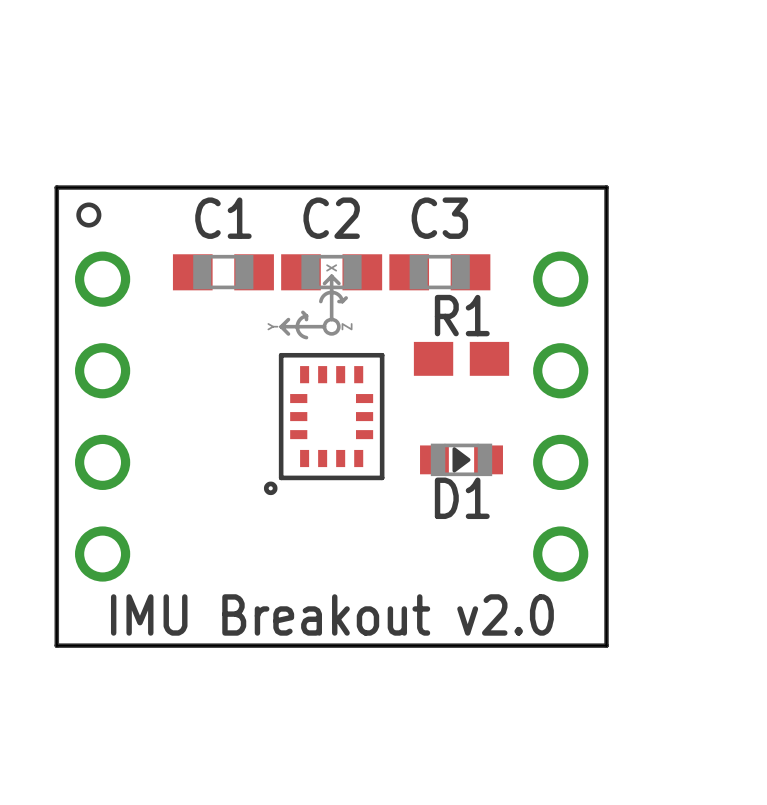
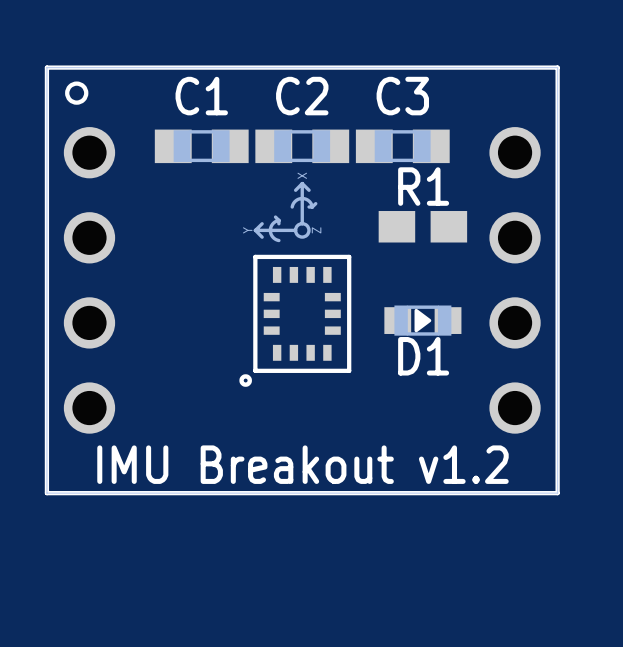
part position: (324, 384) -> (295, 284)
text: IMU Breakout v2.0 (332, 614) -> IMU Breakout v1.2 (302, 464)

